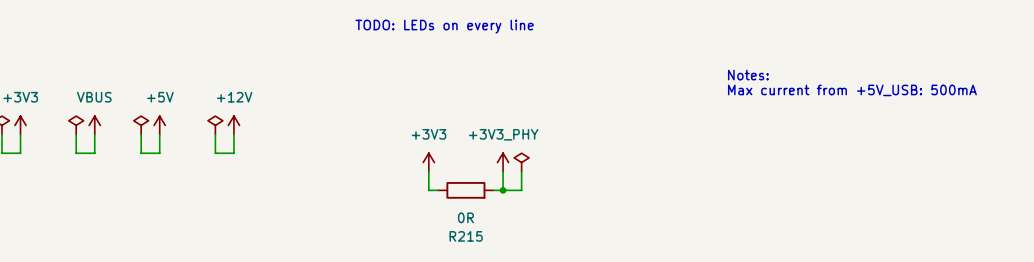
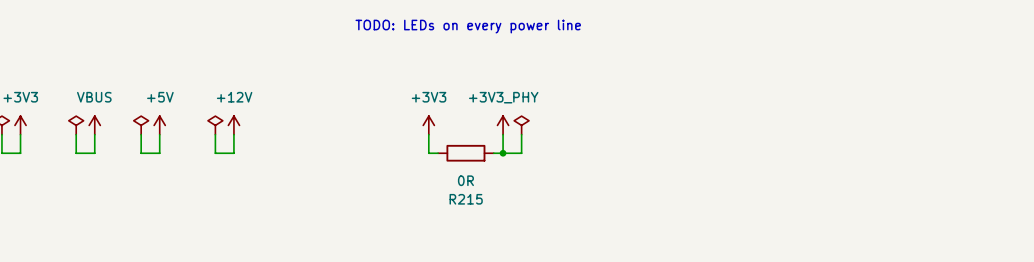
text: TODO: LEDs on every line (444, 26) -> TODO: LEDs on every power line (468, 26)
text: Notes: (748, 75) -> none
text: Max current from +5V_USB: 500mA (852, 90) -> none
power symbol position: +3V3 (428, 162) -> +3V3 (428, 125)
power symbol position: +3V3_PHY (503, 162) -> +3V3_PHY (503, 125)
power symbol position: (521, 162) -> (521, 125)
wire: (428, 171) (428, 190) (438, 190) -> (428, 134) (428, 153) (438, 153)
wire: (503, 171) (503, 190) -> (503, 134) (503, 153)
wire: (521, 171) (521, 190) (493, 190) -> (521, 134) (521, 153) (493, 153)
R215 position: (465, 190) -> (465, 153)
junction position: (503, 190) -> (503, 153)

